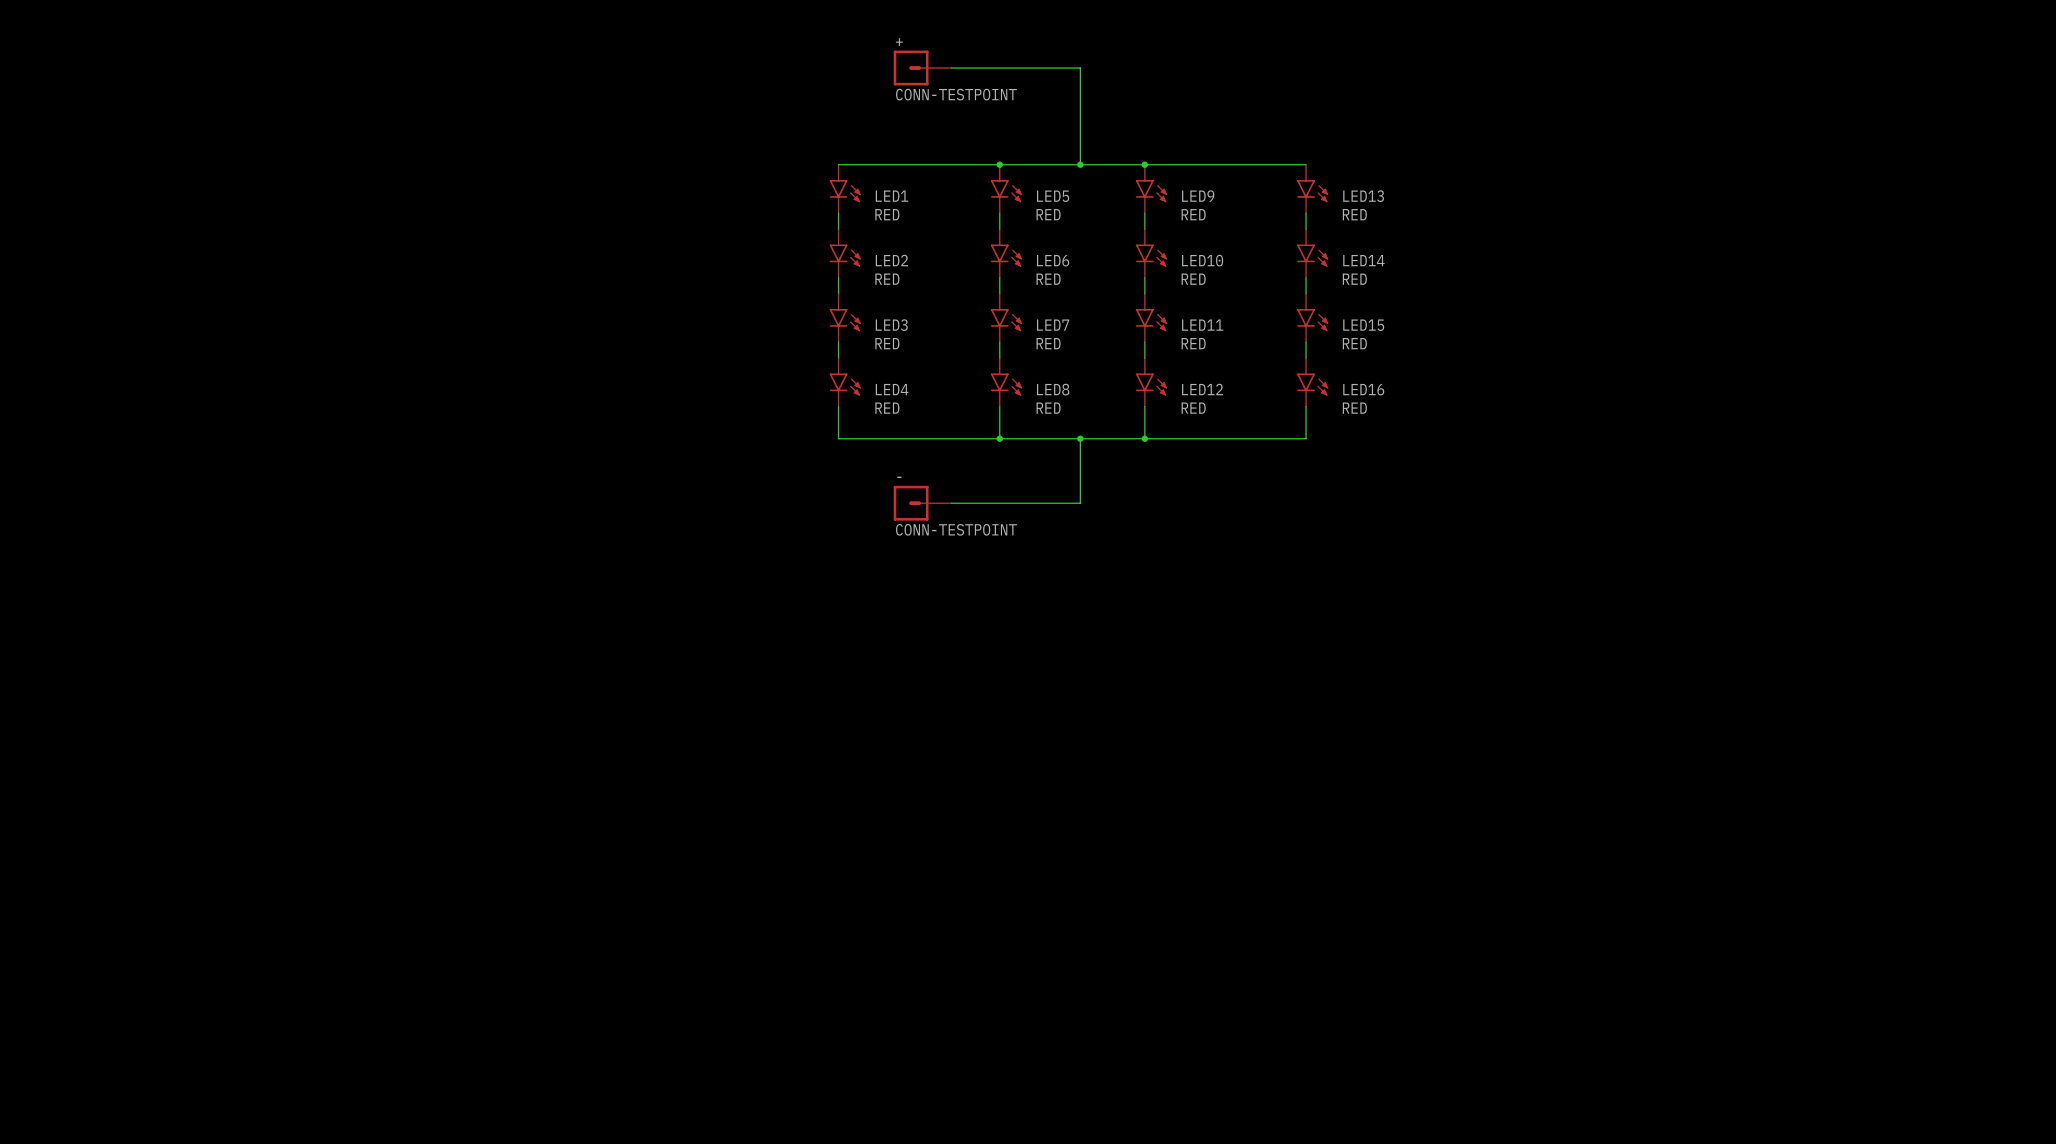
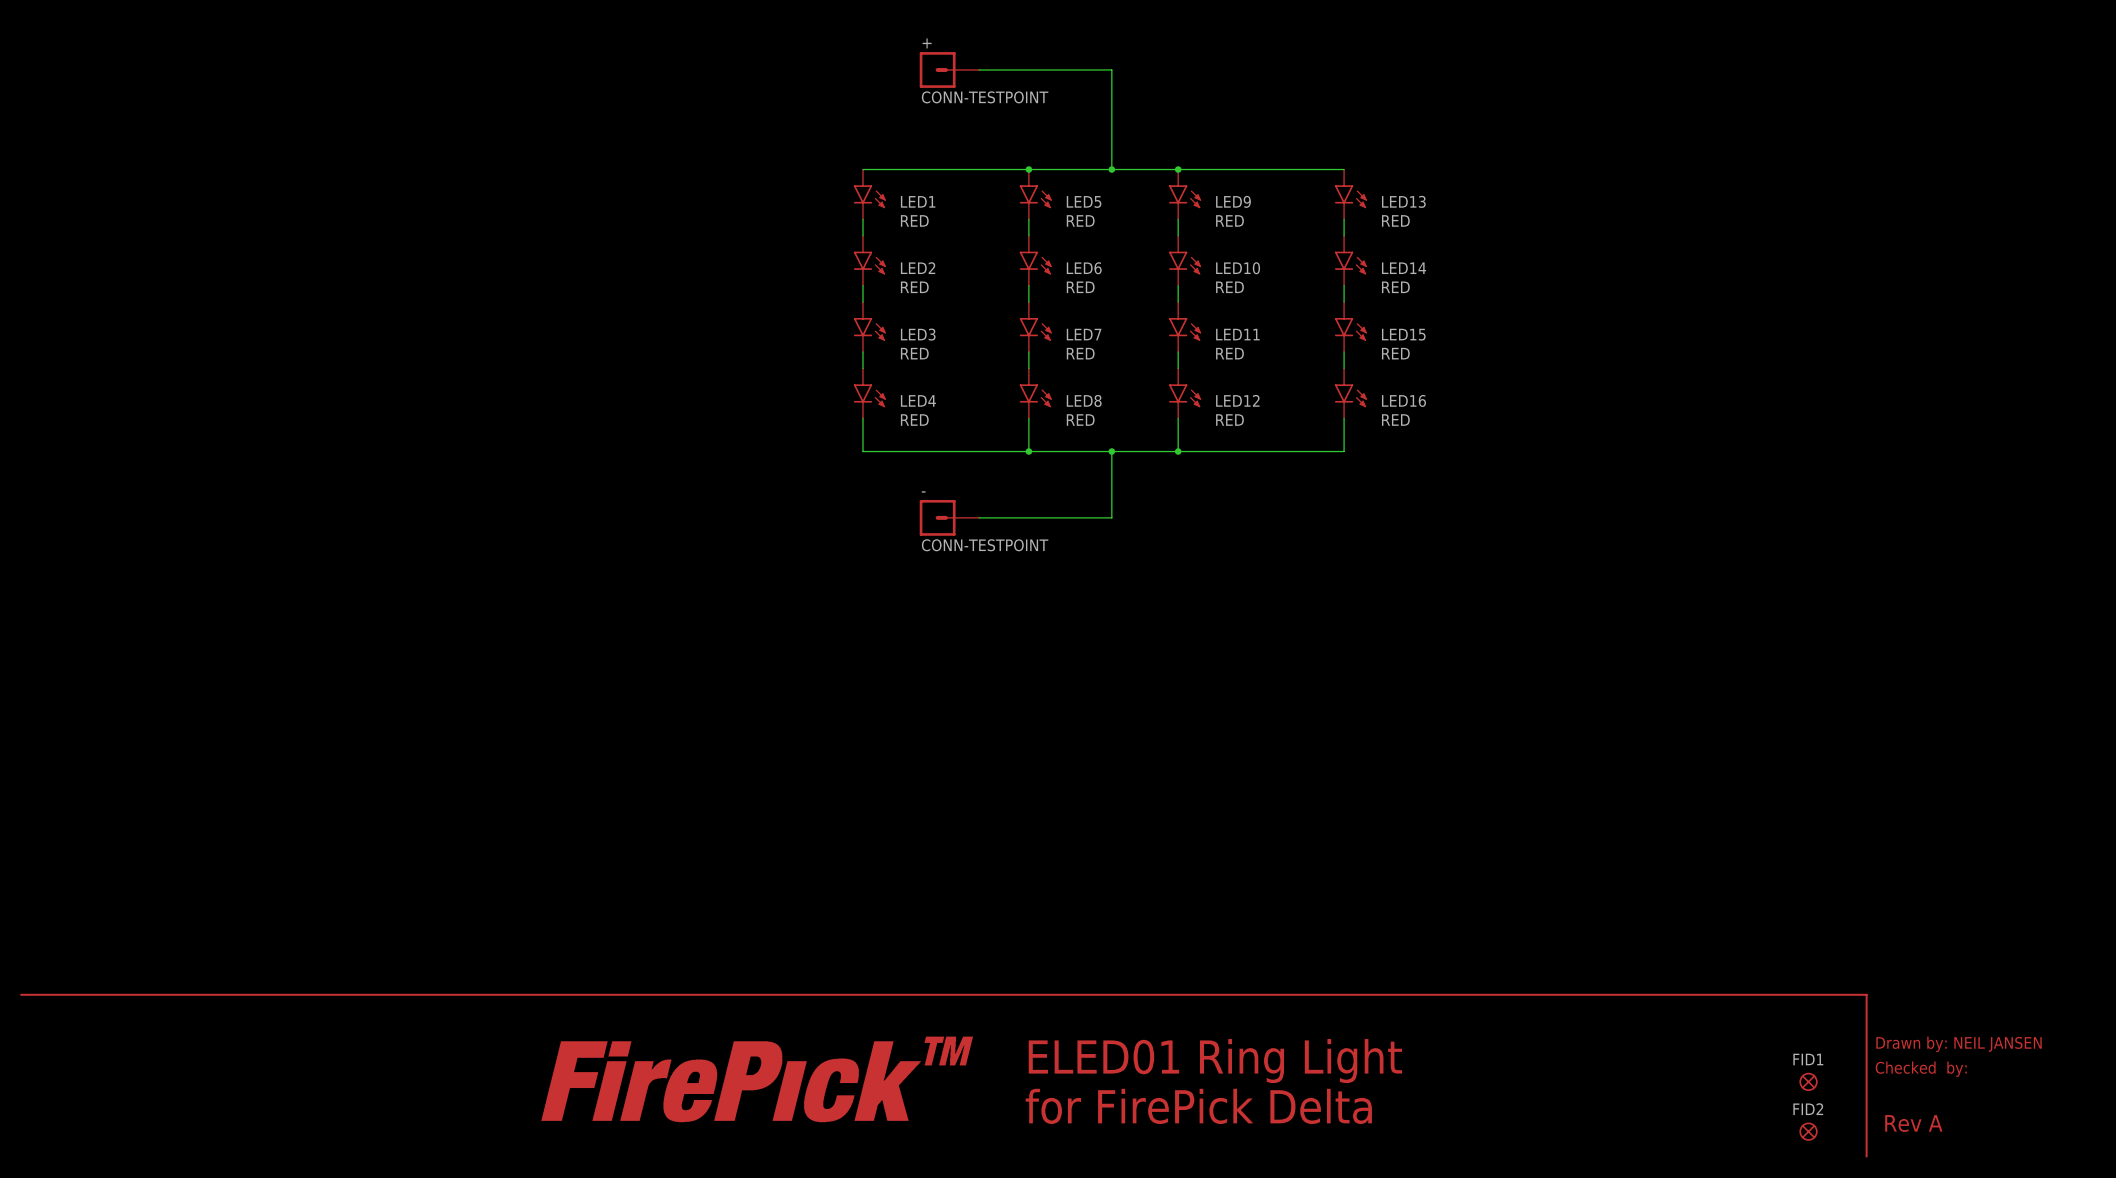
line: none -> (21, 994) (1866, 994) (1866, 1156)
text: none -> Drawn by: NEIL JANSEN (1959, 1044)
text: none -> ELED01 Ring Light (1215, 1061)
text: none -> Checked by: (1921, 1069)
part: none -> (757, 1079)
FID1: none -> (1808, 1081)
text: none -> for FirePick Delta (1198, 1106)
text: none -> Rev A (1913, 1123)
FID2: none -> (1808, 1131)

